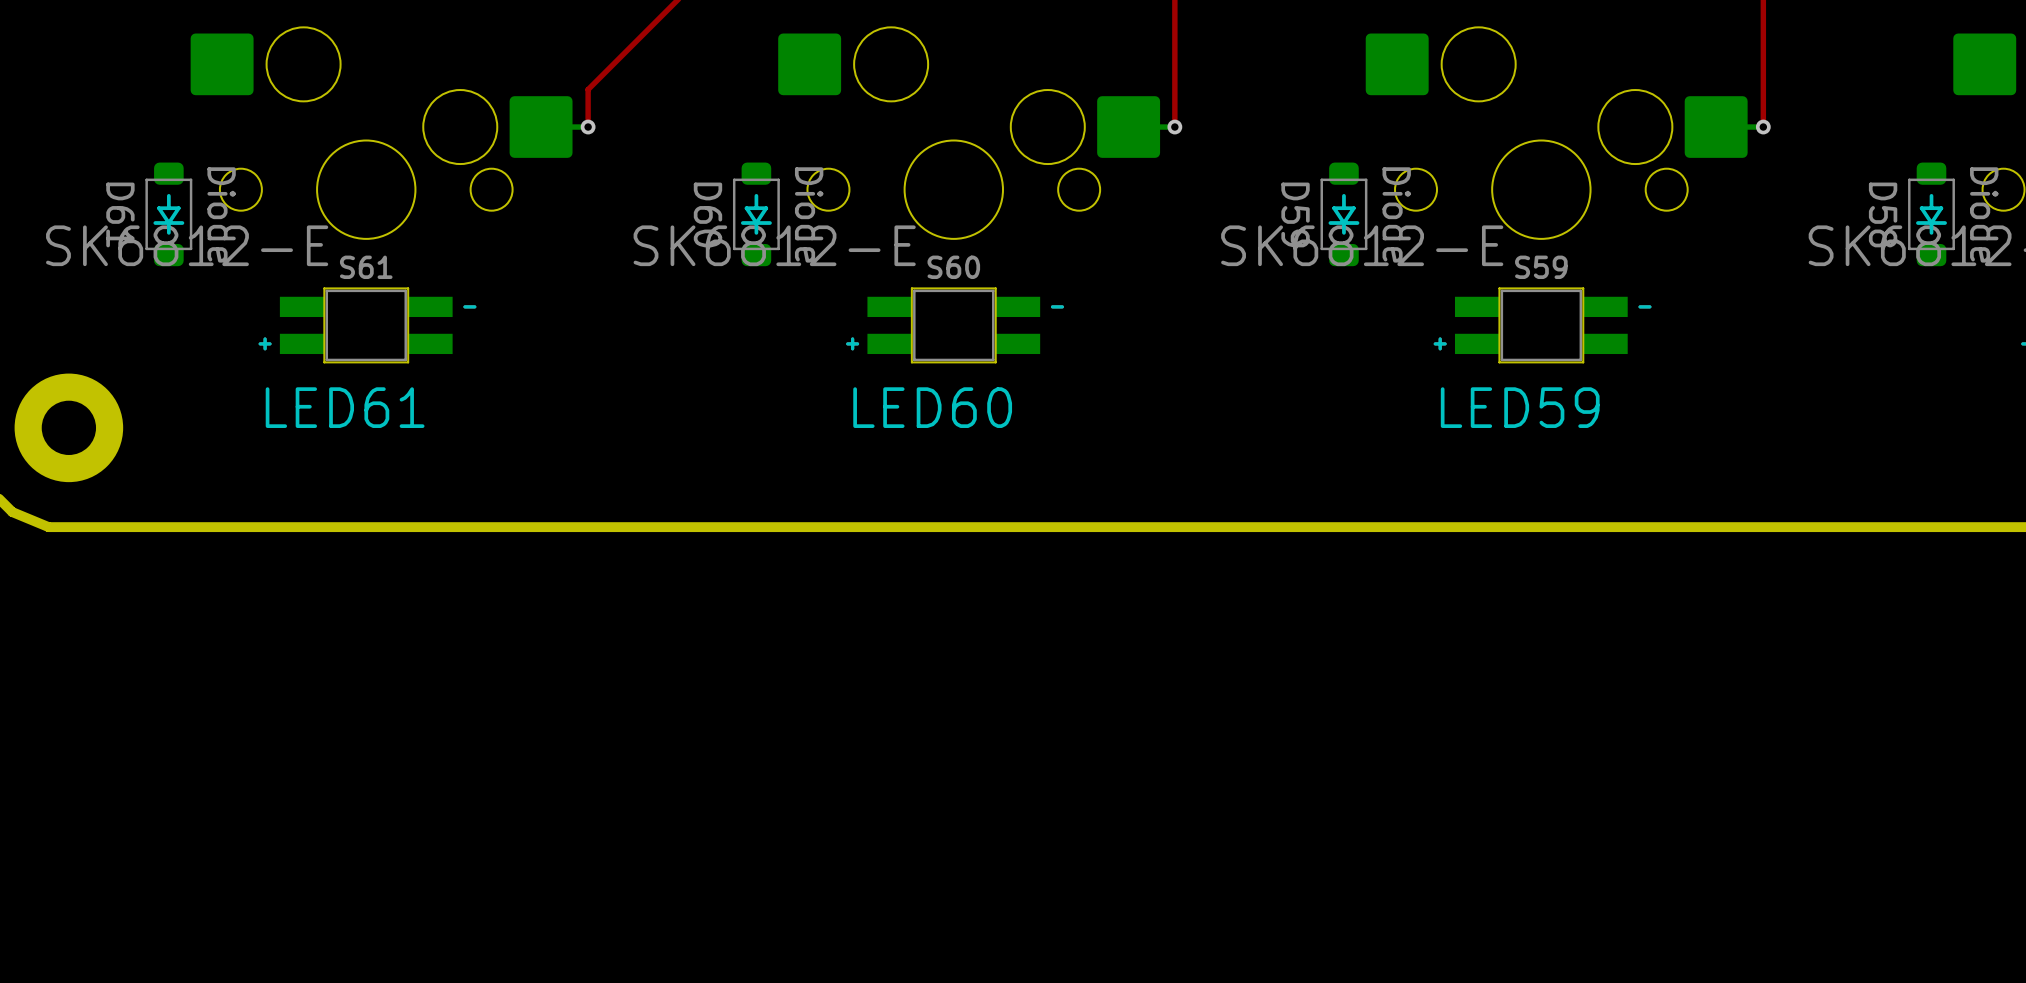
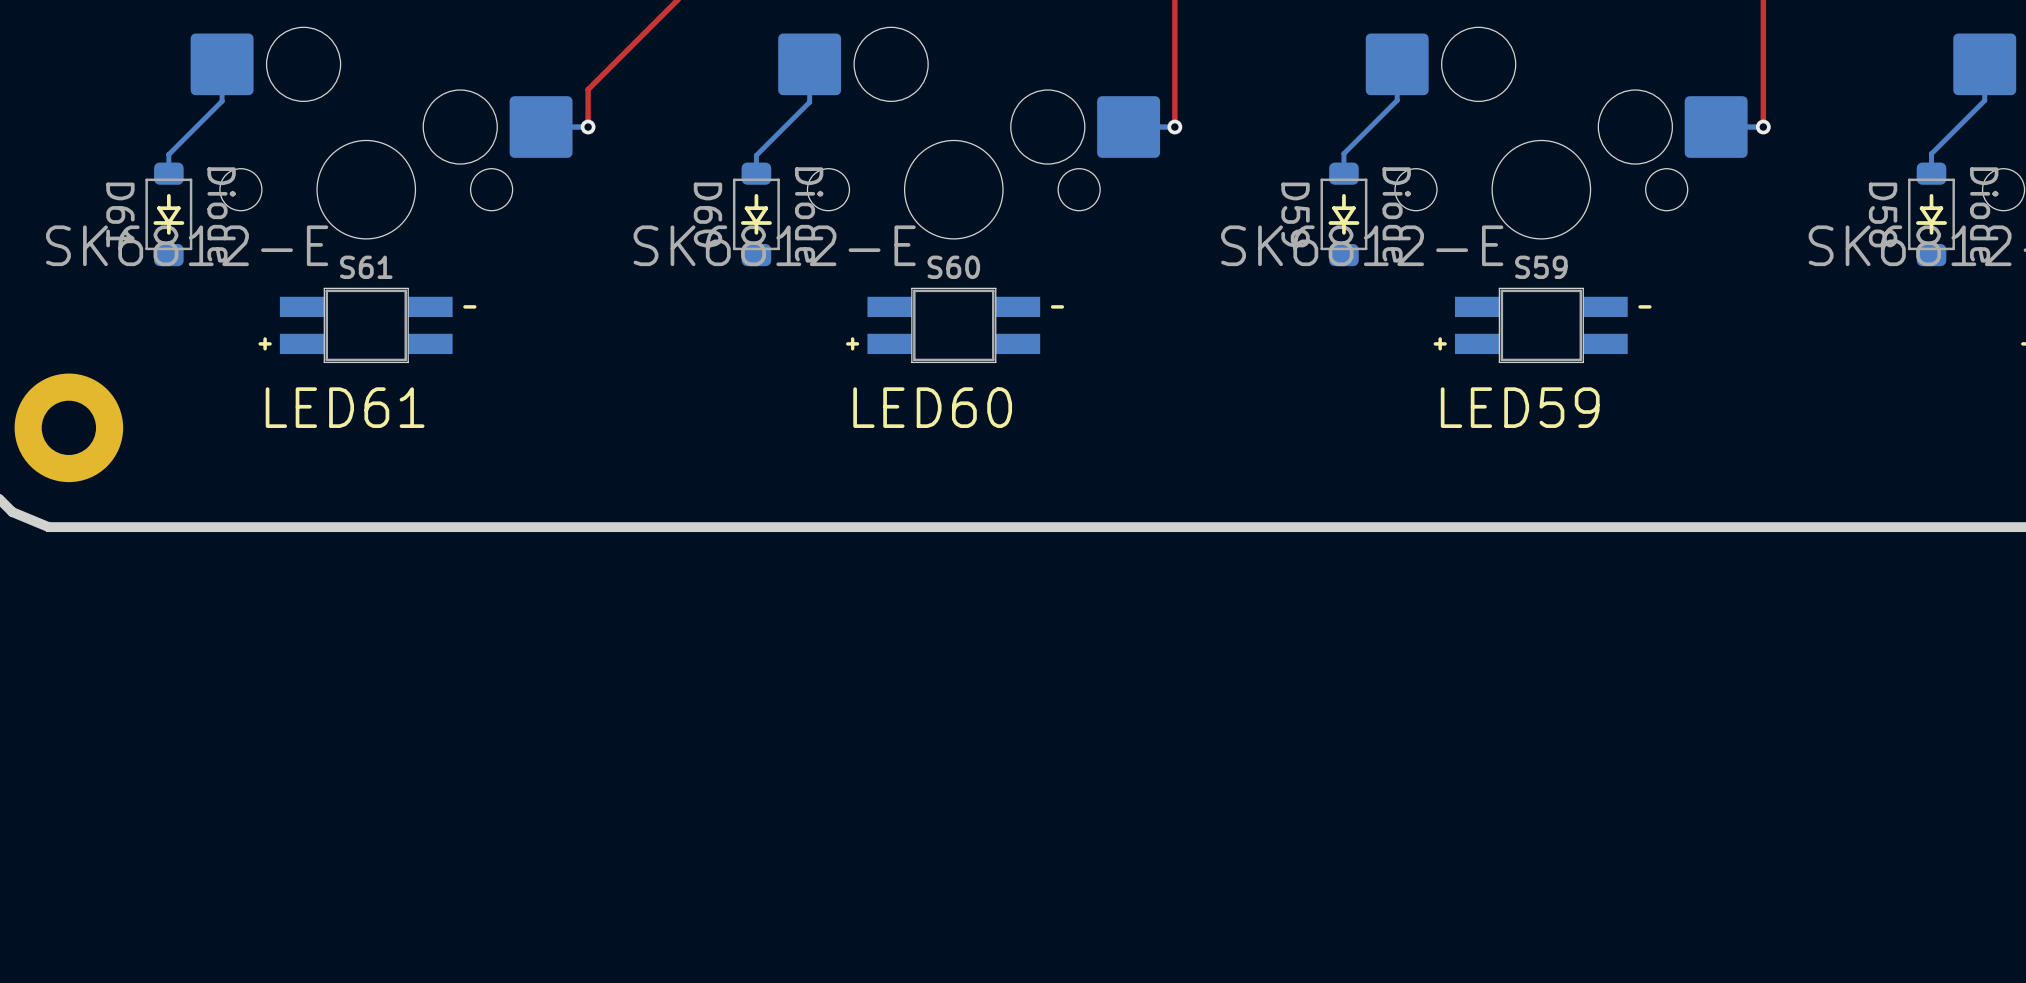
bottom track: none -> (222, 64) (222, 101) (168, 154) (168, 173)
bottom track: none -> (809, 64) (809, 102) (756, 155) (756, 173)
bottom track: none -> (1397, 64) (1397, 100) (1343, 153) (1343, 173)
bottom track: none -> (1984, 64) (1984, 100) (1931, 153) (1931, 173)

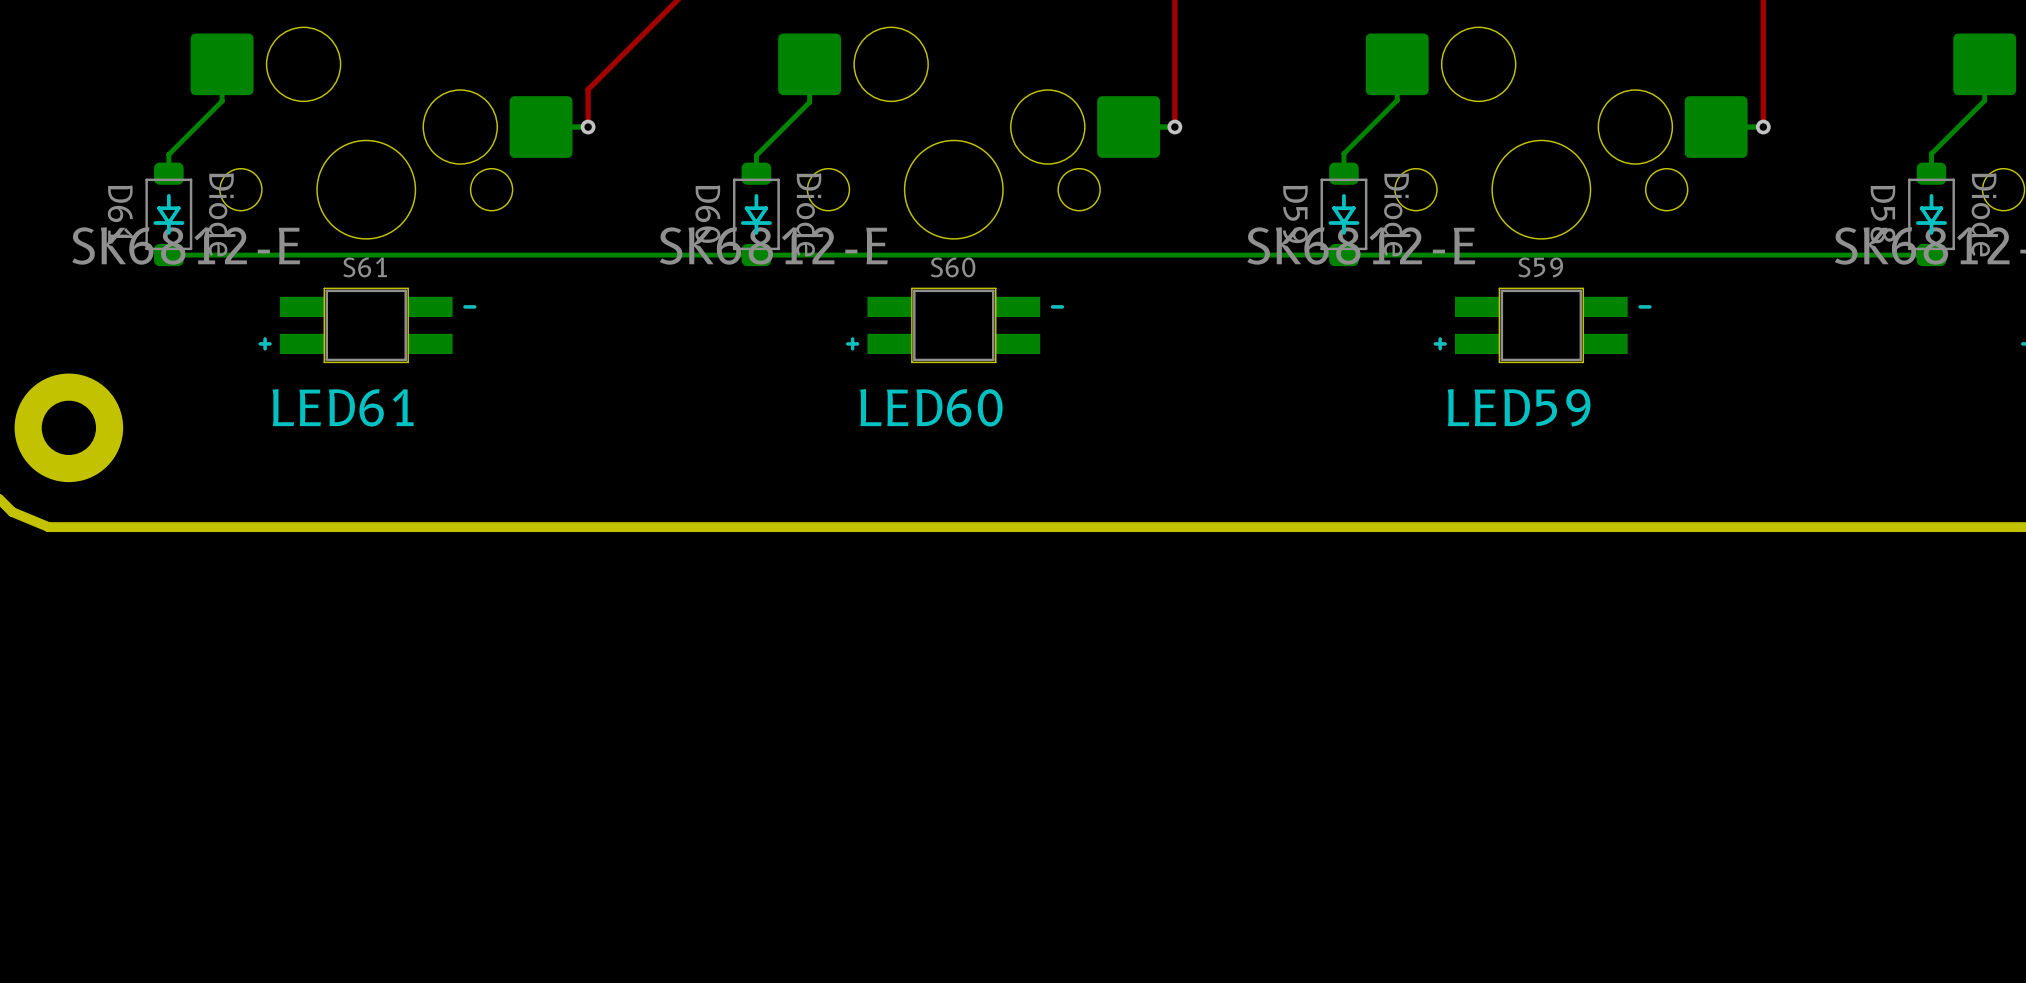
bottom track: none -> (1931, 255) (168, 255)

